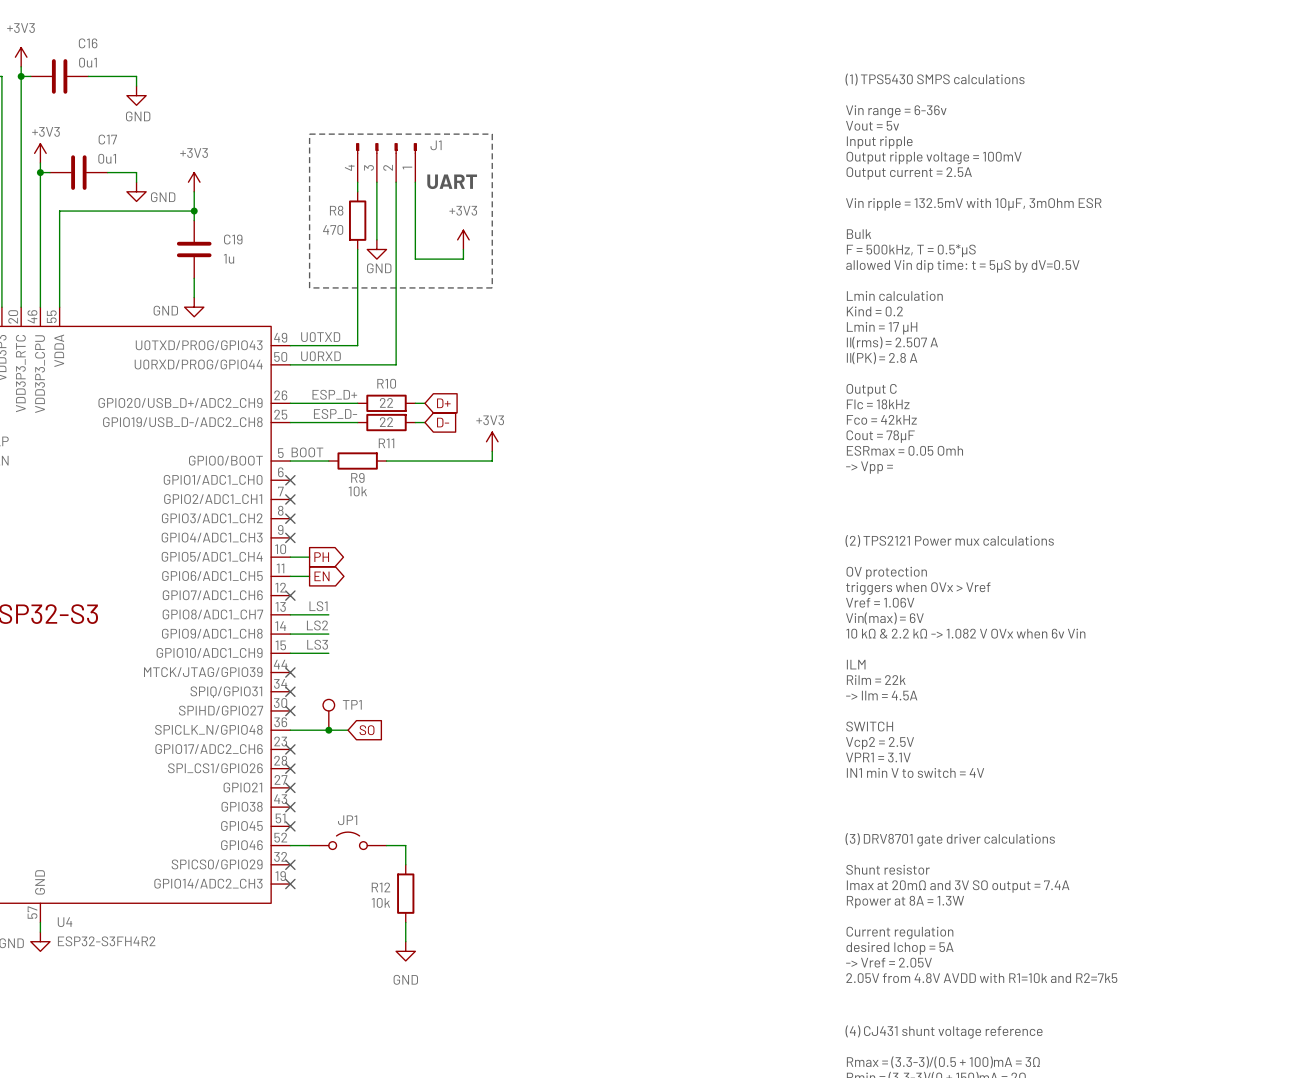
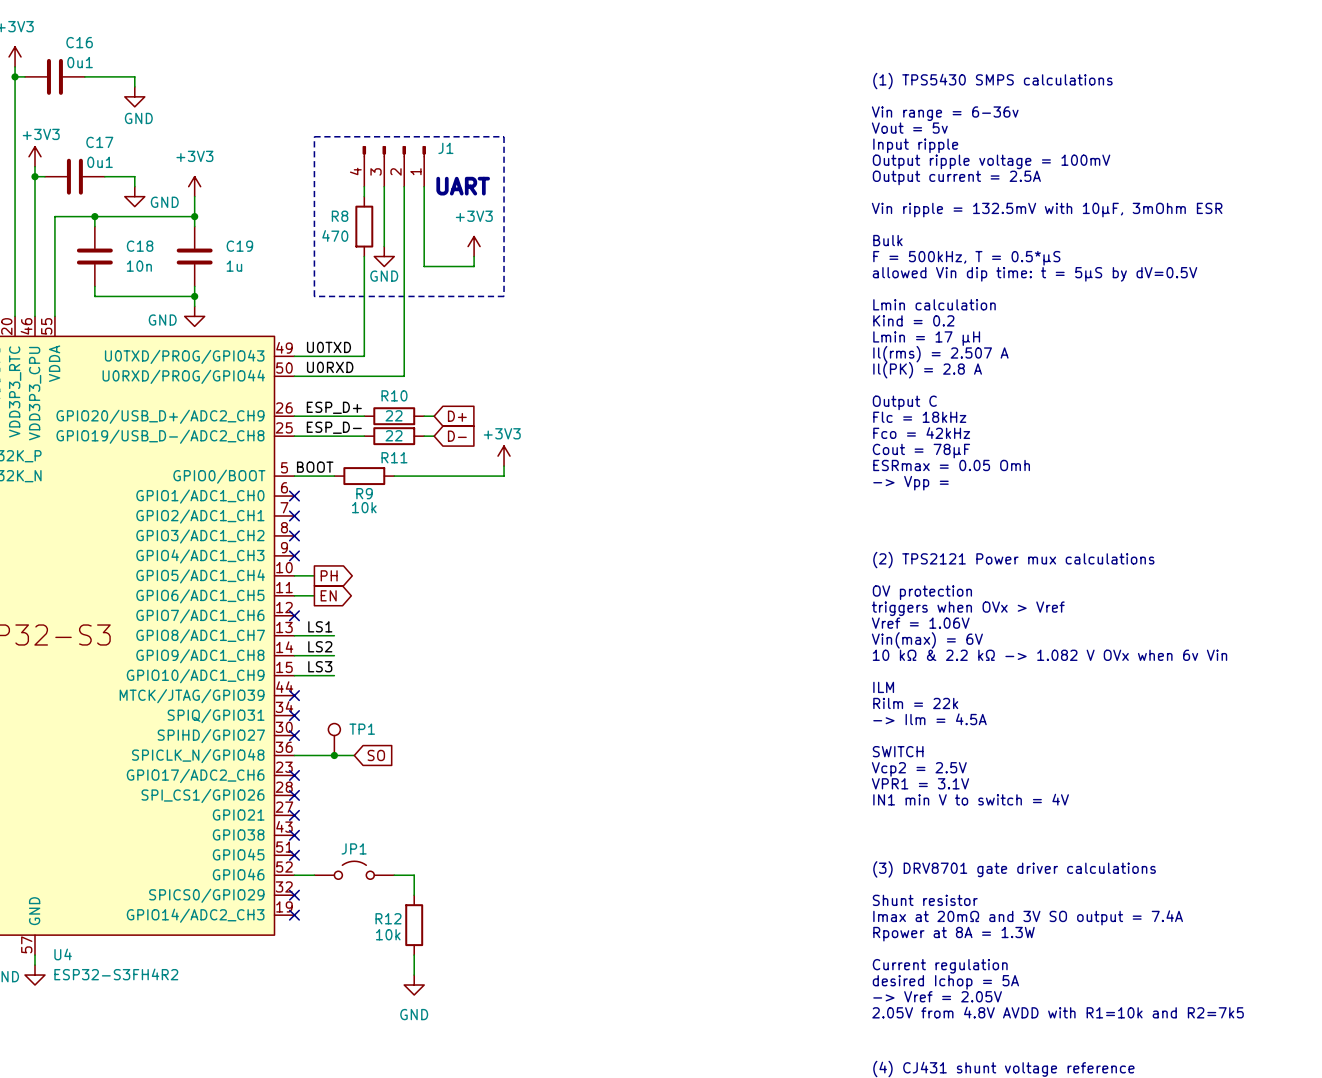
wire: none -> (94, 216) (94, 226)
junction: none -> (94, 216)
C18: none -> 10n (94, 256)
wire: none -> (94, 286) (94, 296) (194, 296)
junction: none -> (194, 296)

